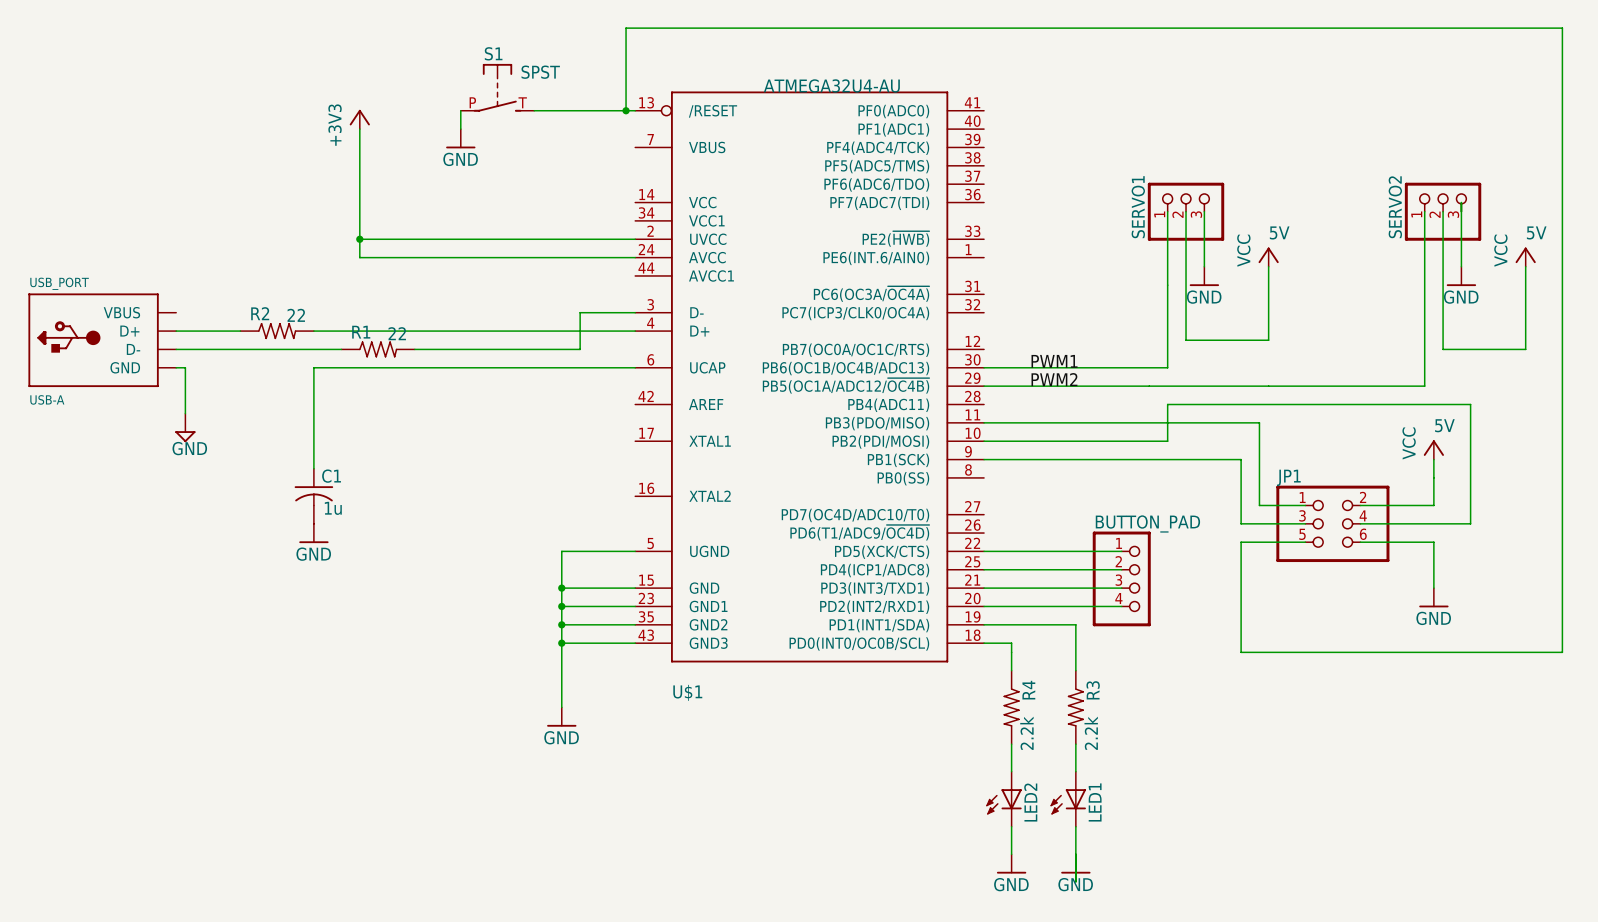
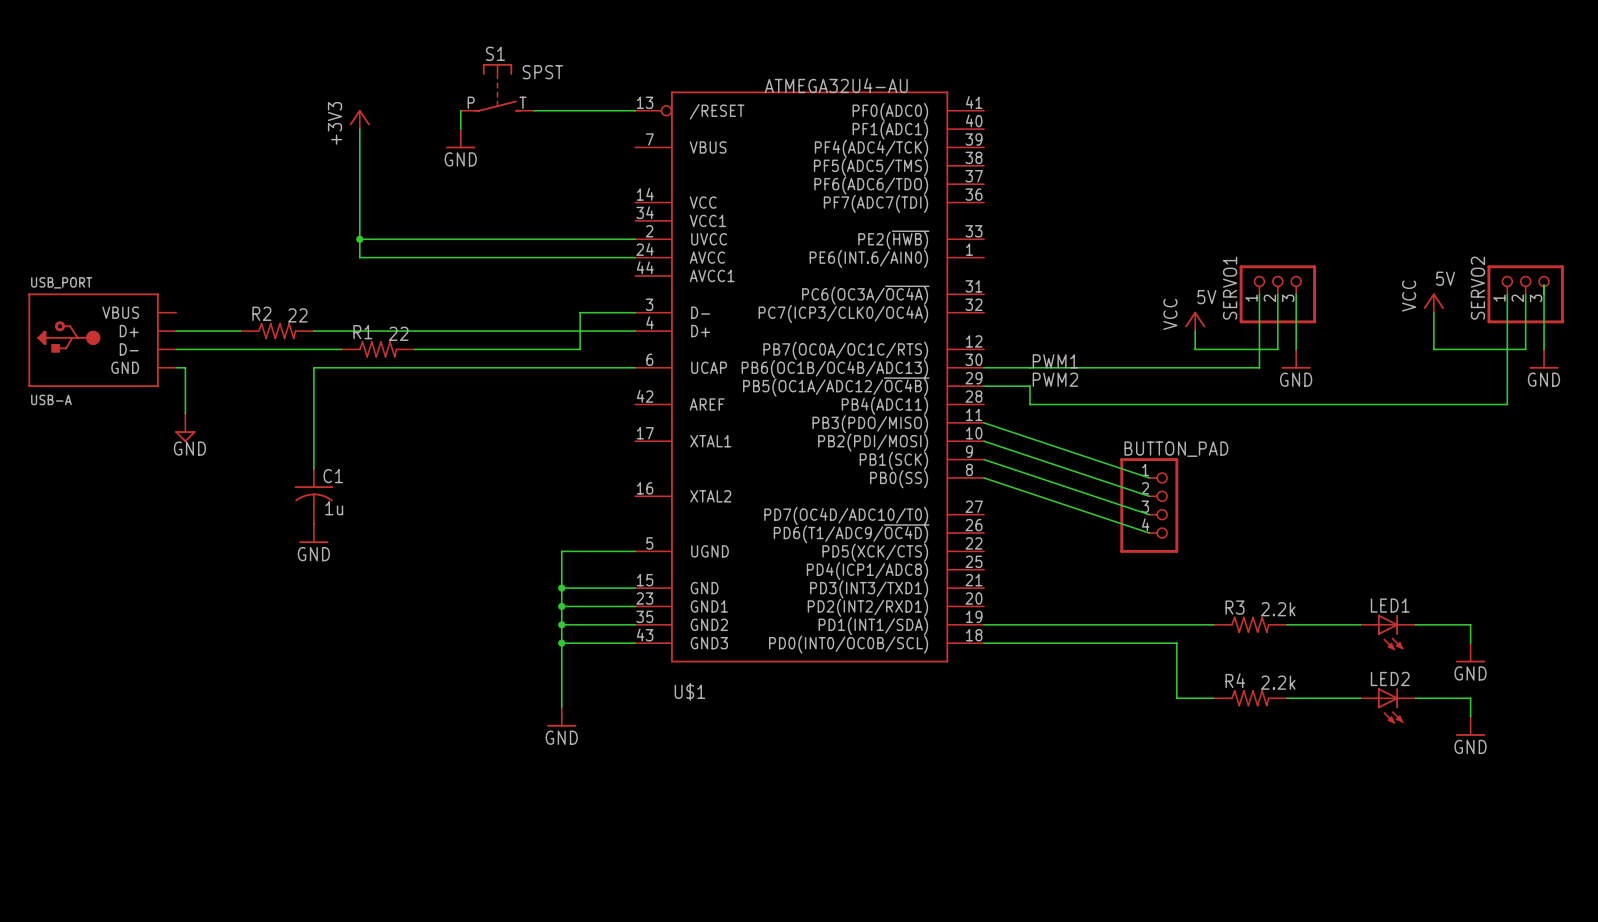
wire: (626, 110) (626, 28) (1562, 28) (1562, 652) (1241, 652) (1241, 542) (1305, 542) -> none
junction: (626, 110) -> none
wire: (1461, 202) (1461, 266) -> (1544, 285) (1544, 349)
wire: (1167, 211) (1167, 367) -> (1259, 294) (1259, 367) (1167, 367)
wire: (1186, 211) (1186, 340) (1268, 340) (1268, 266) -> none
SERVO1 position: (1186, 211) -> (1277, 294)
wire: (1204, 211) (1204, 266) -> (1296, 294) (1296, 349)
wire: (1424, 211) (1424, 386) (1029, 386) -> none
wire: (1443, 211) (1443, 349) -> (1433, 312) (1433, 349) (1443, 349)
SERVO2 position: (1443, 211) -> (1525, 294)
power symbol: VCC (1268, 257) -> none
power symbol: VCC (1525, 257) -> none
wire: (1525, 266) (1525, 294) -> none
power symbol: GND (1204, 276) -> none
power symbol: GND (1461, 276) -> none
wire: none -> (1277, 294) (1277, 349) (1195, 349) (1195, 331)
power symbol: none -> VCC (1433, 303)
power symbol: none -> VCC (1195, 321)
power symbol: none -> GND (1296, 359)
power symbol: none -> GND (1544, 359)
wire: (1167, 404) (1167, 441) (984, 441) -> (1167, 404) (1029, 404) (1029, 386)
wire: (1470, 404) (1470, 523) (1360, 523) -> (1470, 404) (1507, 404) (1507, 294)
wire: (984, 422) (1259, 422) (1259, 505) (1305, 505) -> (984, 422) (1149, 477)
wire: none -> (984, 441) (1149, 496)
power symbol: VCC (1433, 449) -> none
wire: (984, 459) (1241, 459) (1241, 523) (1305, 523) -> (984, 459) (1149, 514)
wire: (1433, 459) (1433, 505) (1360, 505) -> none
wire: none -> (984, 477) (1149, 533)
JP1: (1332, 523) -> none
wire: (1360, 542) (1433, 542) (1433, 588) -> none
wire: (984, 551) (1121, 551) -> none
wire: (984, 569) (1121, 569) -> none
BUTTON_PAD position: (1121, 578) -> (1149, 505)
wire: (984, 588) (1121, 588) -> none
power symbol position: GND (1433, 597) -> GND (1470, 652)
wire: (984, 606) (1121, 606) -> none
wire: (1075, 624) (1075, 670) -> (1075, 624) (1213, 624)
wire: none -> (1287, 624) (1360, 624)
wire: none -> (1415, 624) (1470, 624) (1470, 643)
wire: (1011, 643) (1011, 670) -> (1011, 643) (1176, 643) (1176, 698) (1213, 698)
wire: none -> (1287, 698) (1360, 698)
wire: none -> (1415, 698) (1470, 698) (1470, 716)
R4 rotation: 0° (1011, 707) -> 90° counterclockwise (1250, 698)
R4 position: (1011, 707) -> (1250, 698)
R3 rotation: 0° (1075, 707) -> 90° counterclockwise (1250, 624)
R3 position: (1075, 707) -> (1250, 624)
power symbol: none -> GND (1470, 726)
wire: (1011, 744) (1011, 771) -> none
wire: (1075, 744) (1075, 771) -> none
LED2 position: (1003, 799) -> (1387, 705)
LED1 position: (1068, 799) -> (1387, 632)
LED2 rotation: 0° (1003, 801) -> 90° counterclockwise (1390, 705)
LED1 rotation: 0° (1068, 801) -> 90° counterclockwise (1390, 632)
wire: (1011, 826) (1011, 854) -> none
wire: (1075, 826) (1075, 881) -> none
power symbol: GND (1011, 863) -> none
power symbol: GND (1075, 863) -> none

